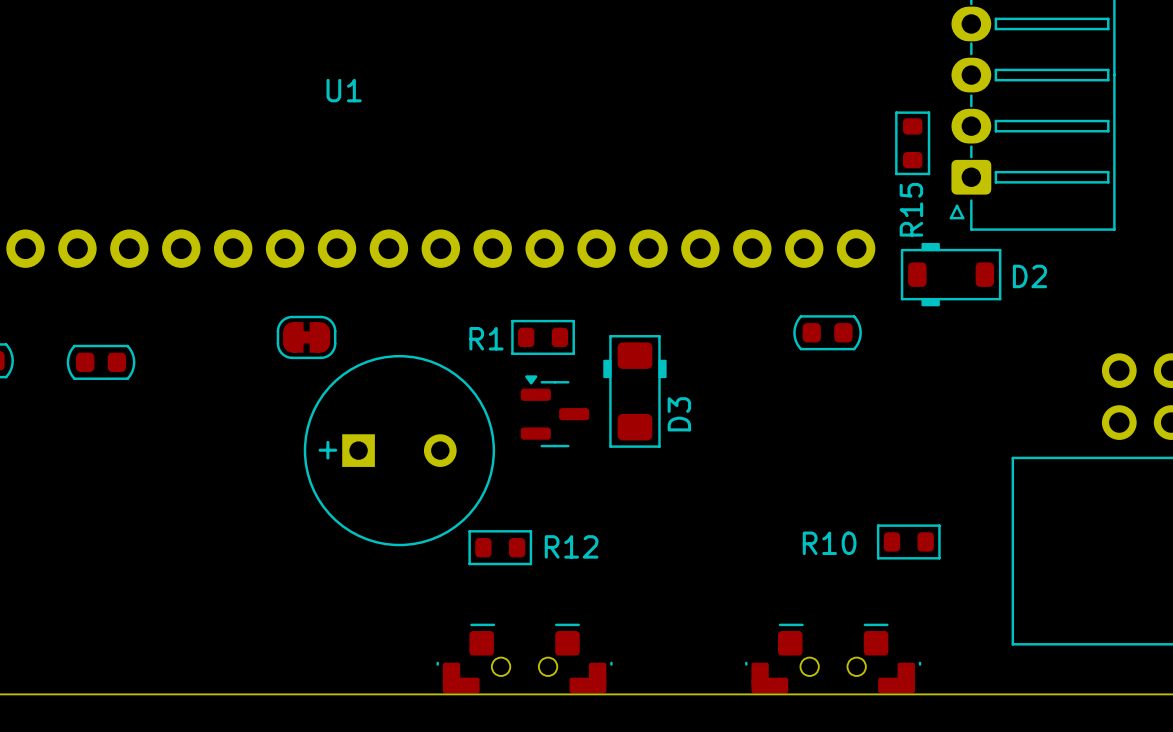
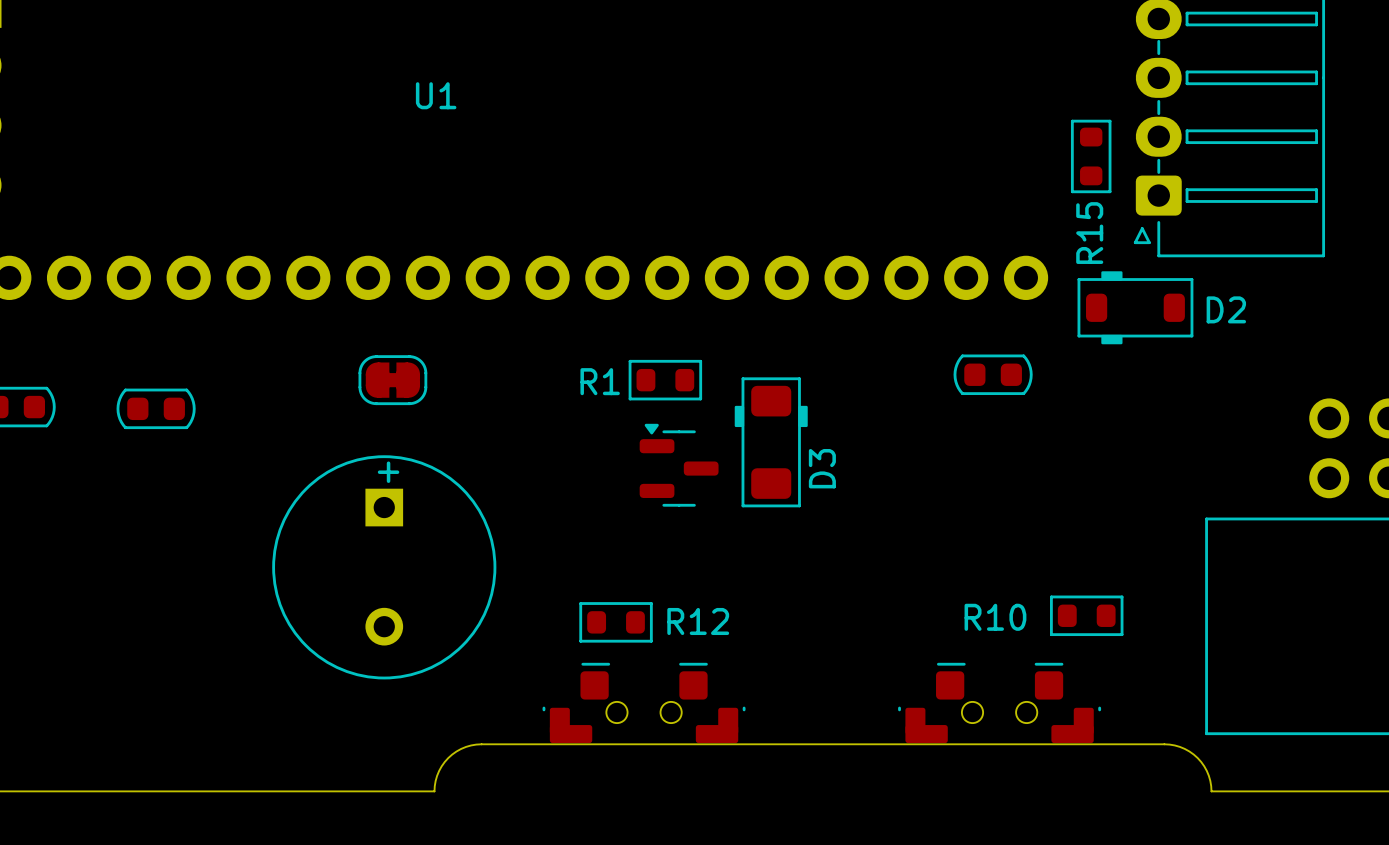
part: (399, 450) -> none
part: none -> (384, 567)
part position: (524, 658) -> (644, 702)
part position: (833, 658) -> (999, 702)
board edge: (342, 694) (1017, 694) -> (434, 791) (437, 775) (448, 758) (466, 746) (481, 744) (1169, 744) (1189, 751) (1201, 762) (1208, 775) (1211, 791)

